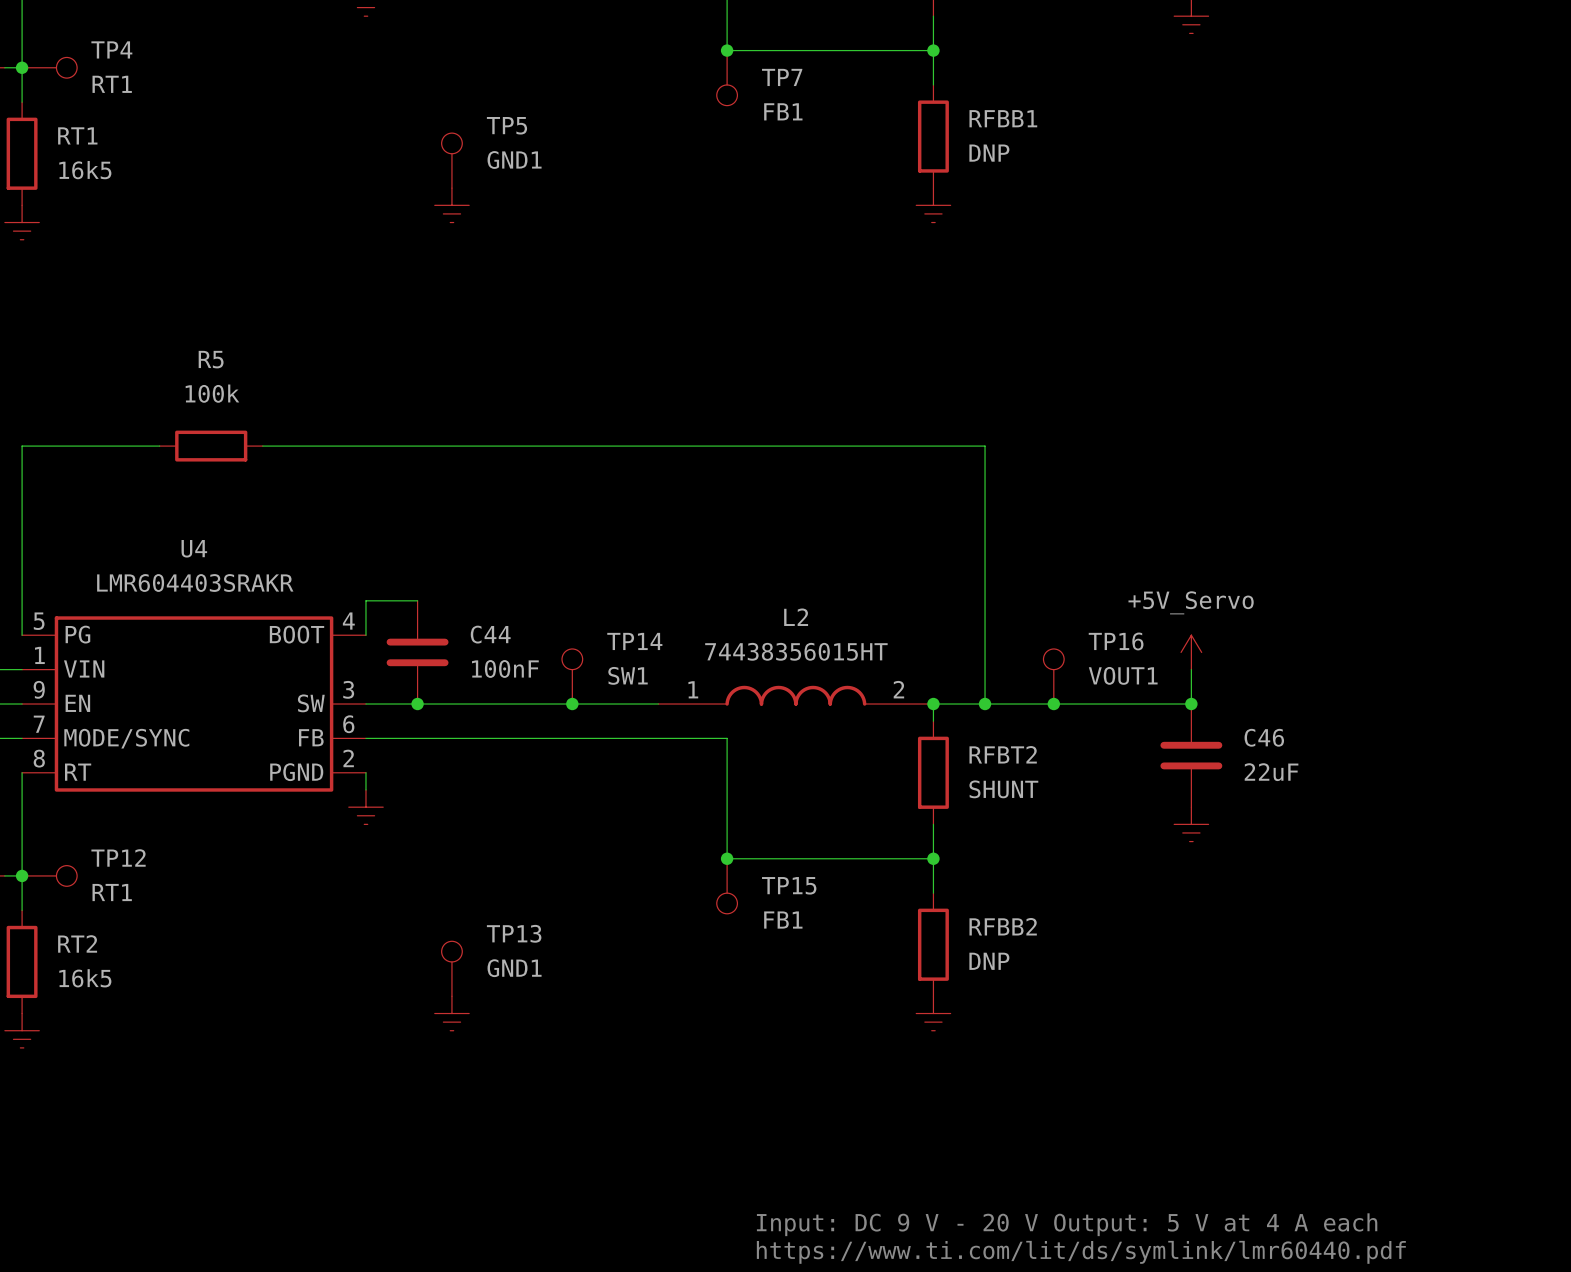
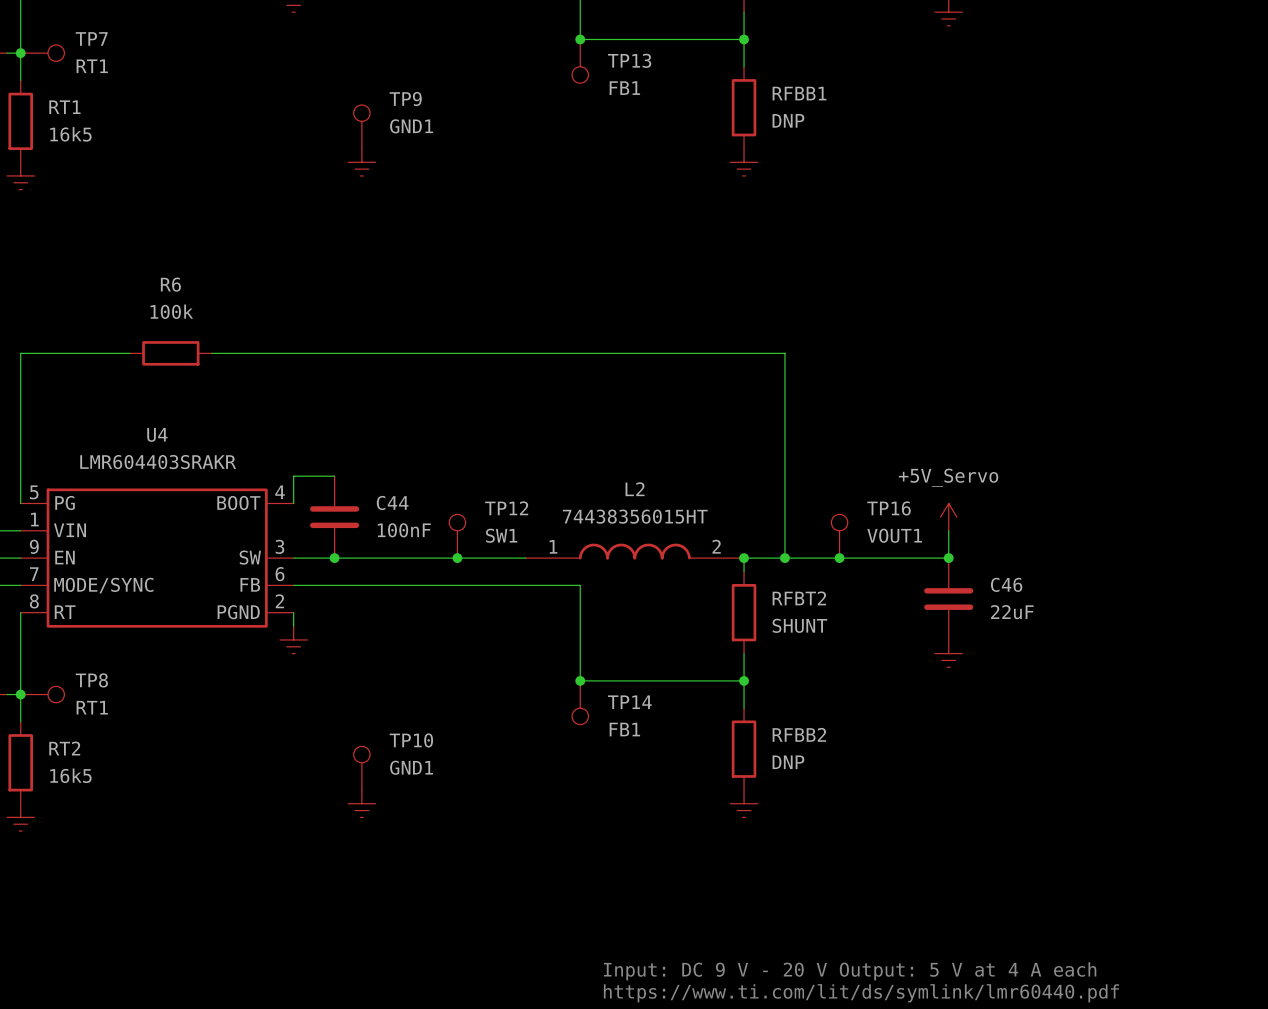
TP4 name: TP4 (111, 49) -> TP7 (91, 38)
TP7 name: TP7 (782, 77) -> TP13 (629, 60)
TP5 name: TP5 (506, 125) -> TP9 (405, 99)
R5 name: R5 (211, 359) -> R6 (170, 284)
TP14 name: TP14 (634, 641) -> TP12 (506, 508)
TP12 name: TP12 (118, 857) -> TP8 (91, 680)
TP15 name: TP15 (789, 885) -> TP14 (629, 702)
TP13 name: TP13 (514, 933) -> TP10 (411, 740)

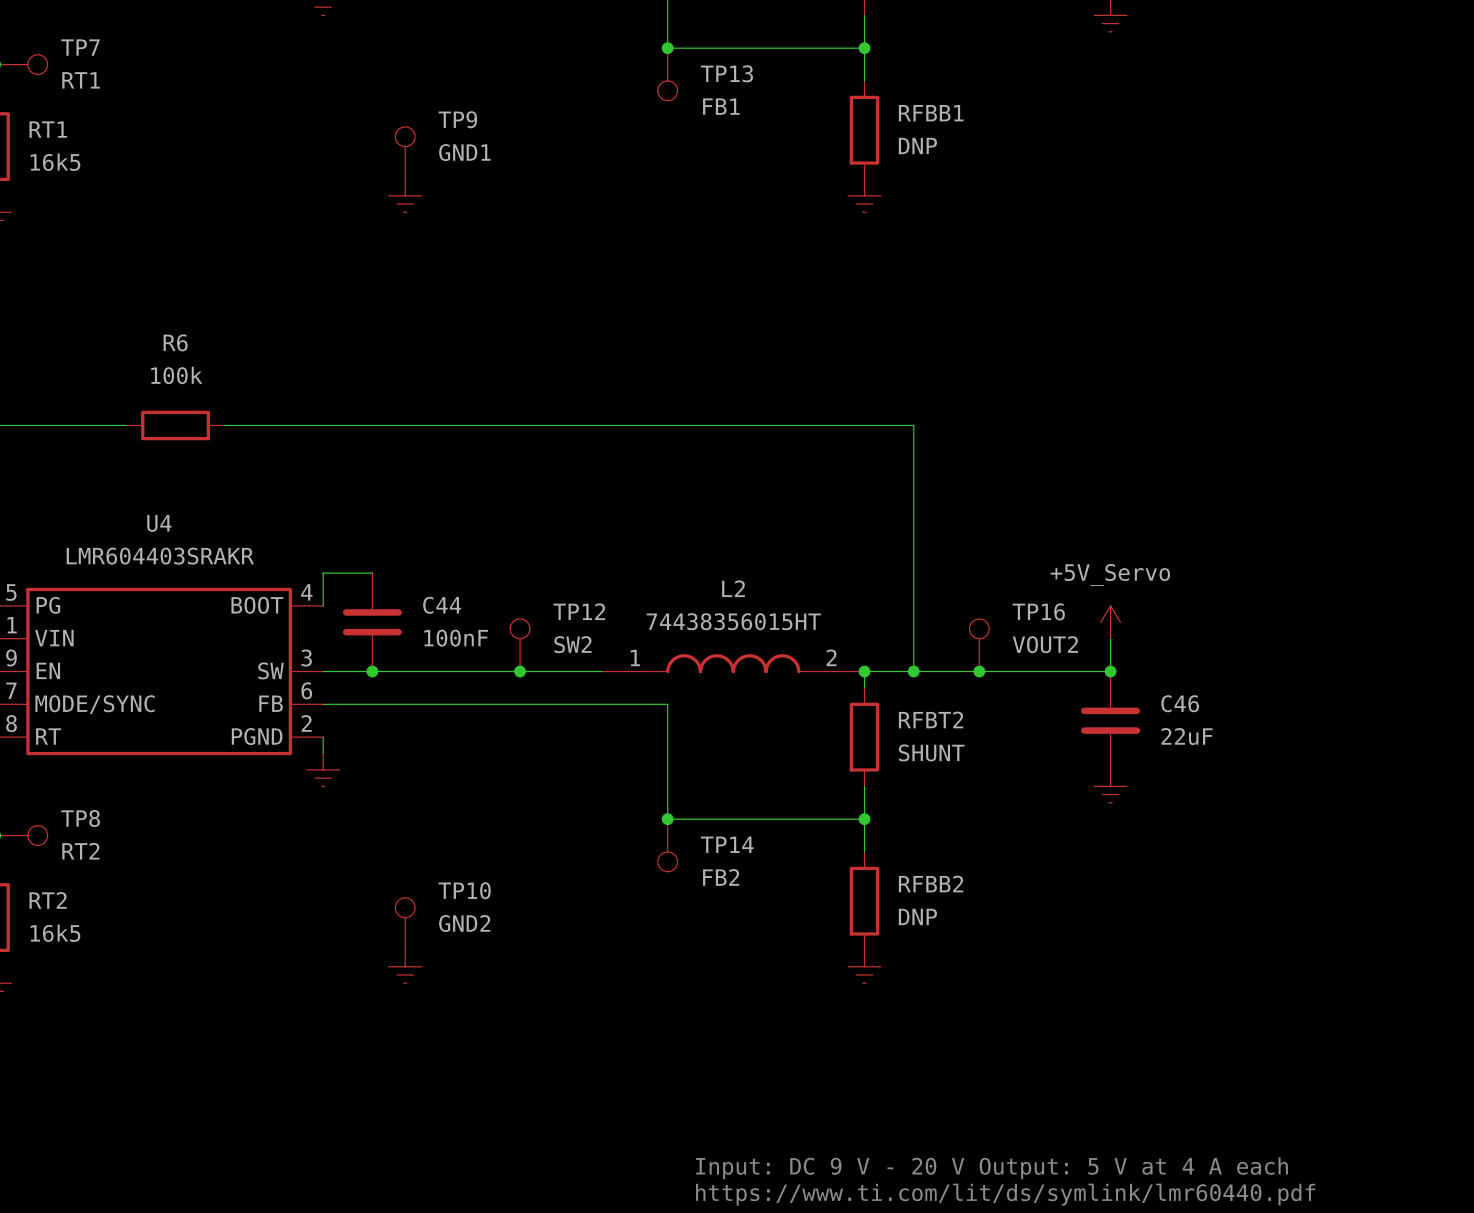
TP12 value: SW1 (501, 535) -> SW2 (572, 644)
TP16 value: VOUT1 (894, 535) -> VOUT2 (1045, 644)
TP8 value: RT1 (92, 707) -> RT2 (80, 851)
TP14 value: FB1 (624, 729) -> FB2 (721, 877)
TP10 value: GND1 (411, 767) -> GND2 (464, 923)

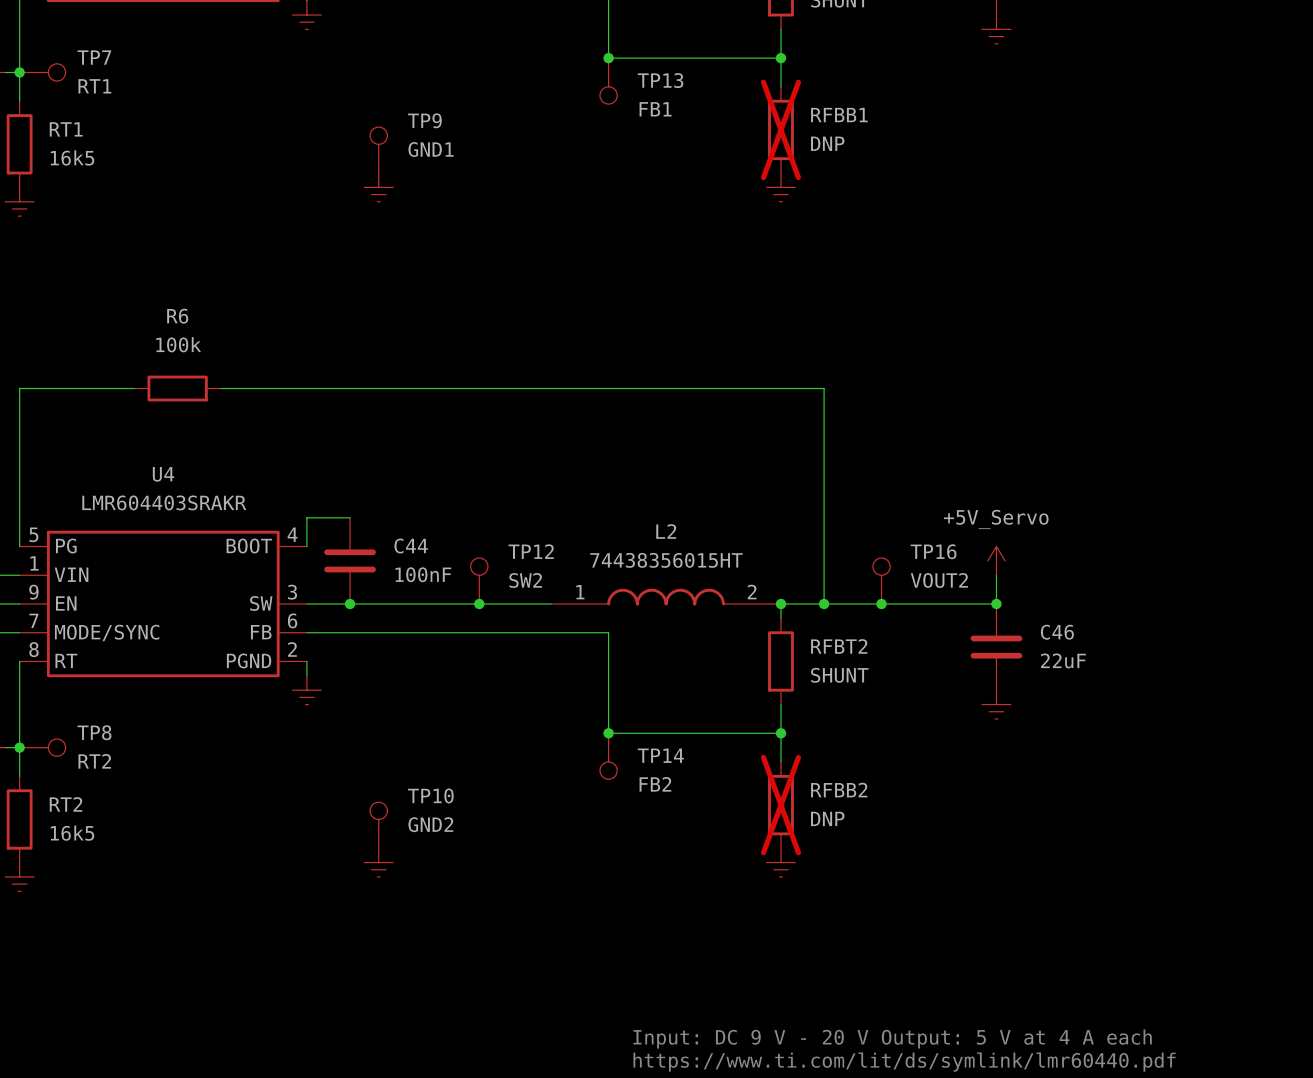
RFBB1 do-not-place cross: none -> (780, 129)
RFBB2 do-not-place cross: none -> (780, 805)

